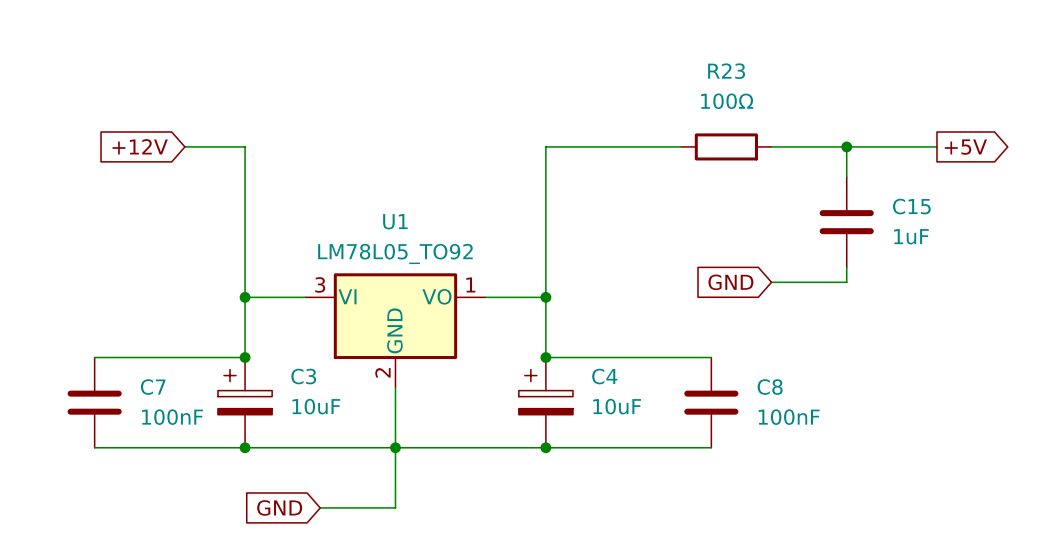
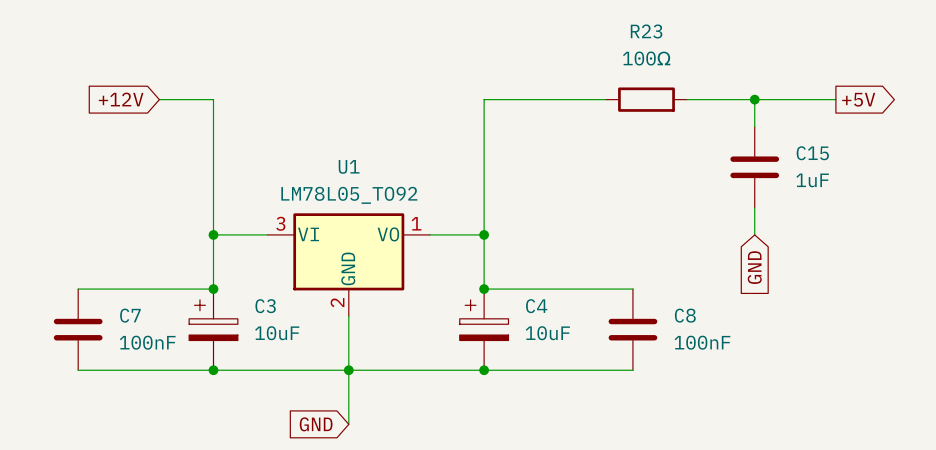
global label rotation: 0° (730, 282) -> 90° counterclockwise (754, 267)
global label position: GND (730, 282) -> GND (754, 267)
wire: (771, 282) (846, 282) -> (754, 234) (754, 221)
global label position: GND (279, 507) -> GND (316, 424)
wire: (320, 507) (395, 507) -> none

